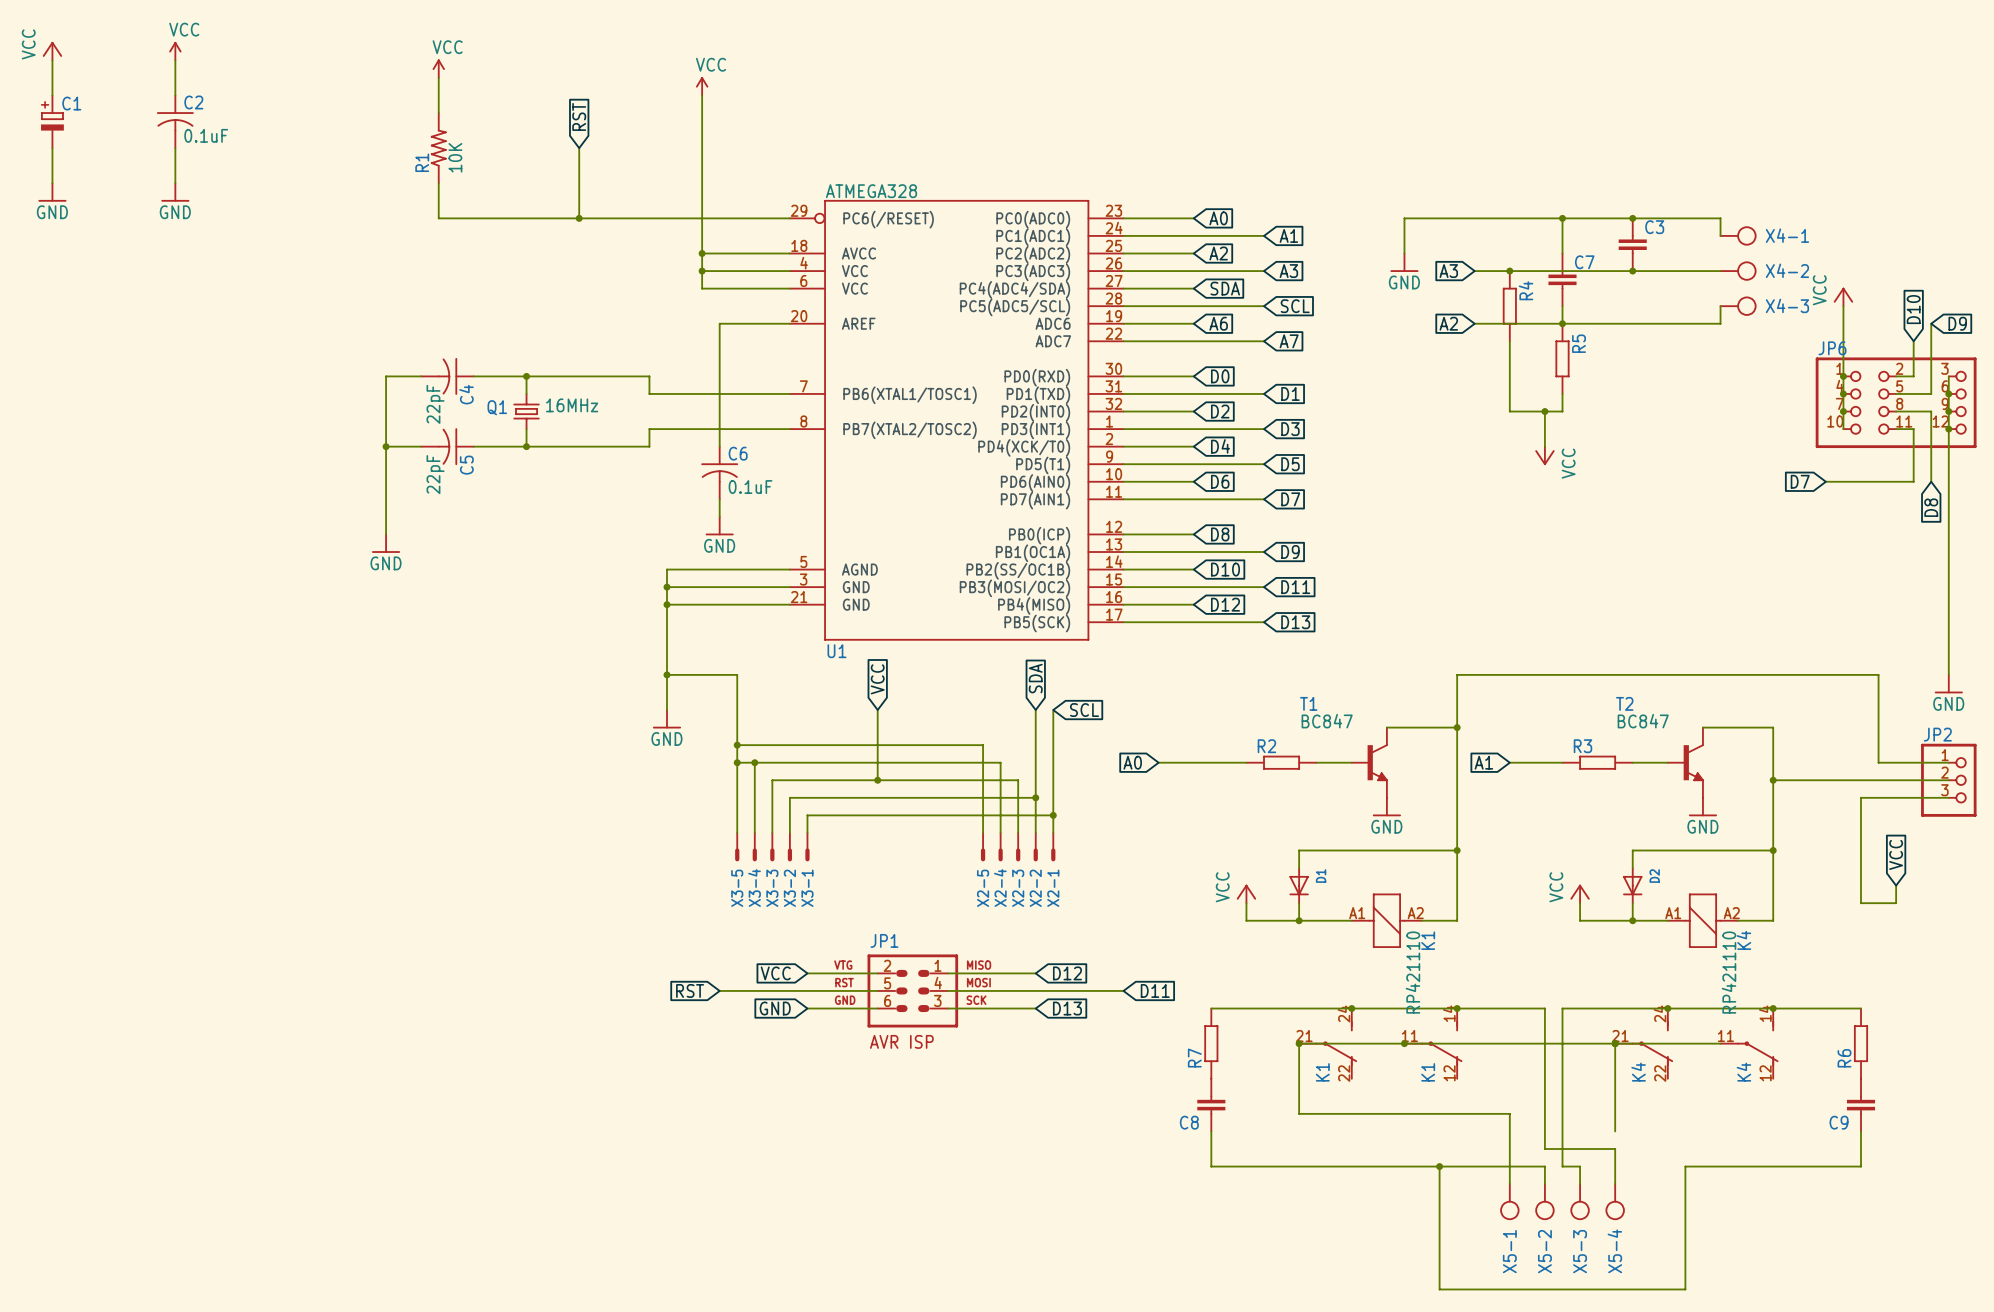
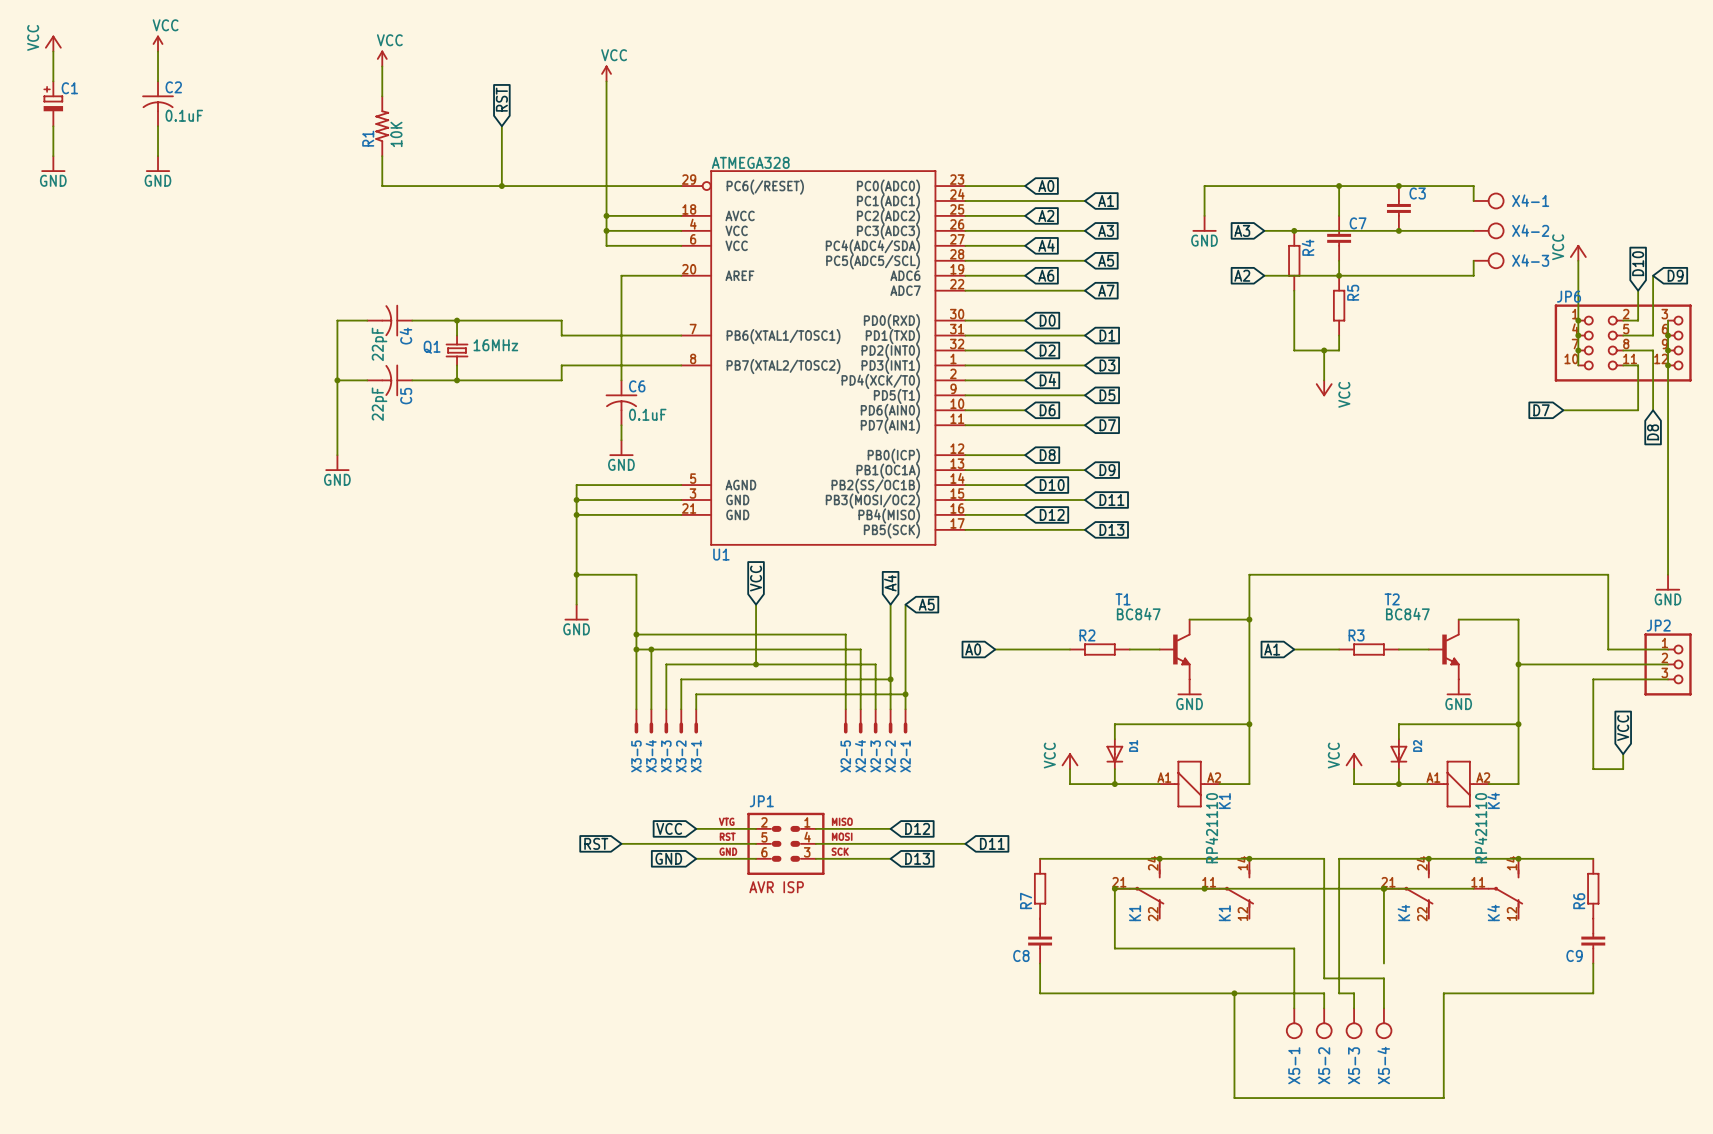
global label: SDA (1225, 288) -> A4 (1046, 245)
global label: SCL (1295, 306) -> A5 (1106, 260)
global label: SDA (1035, 678) -> A4 (890, 583)
global label: SCL (1084, 710) -> A5 (926, 604)

